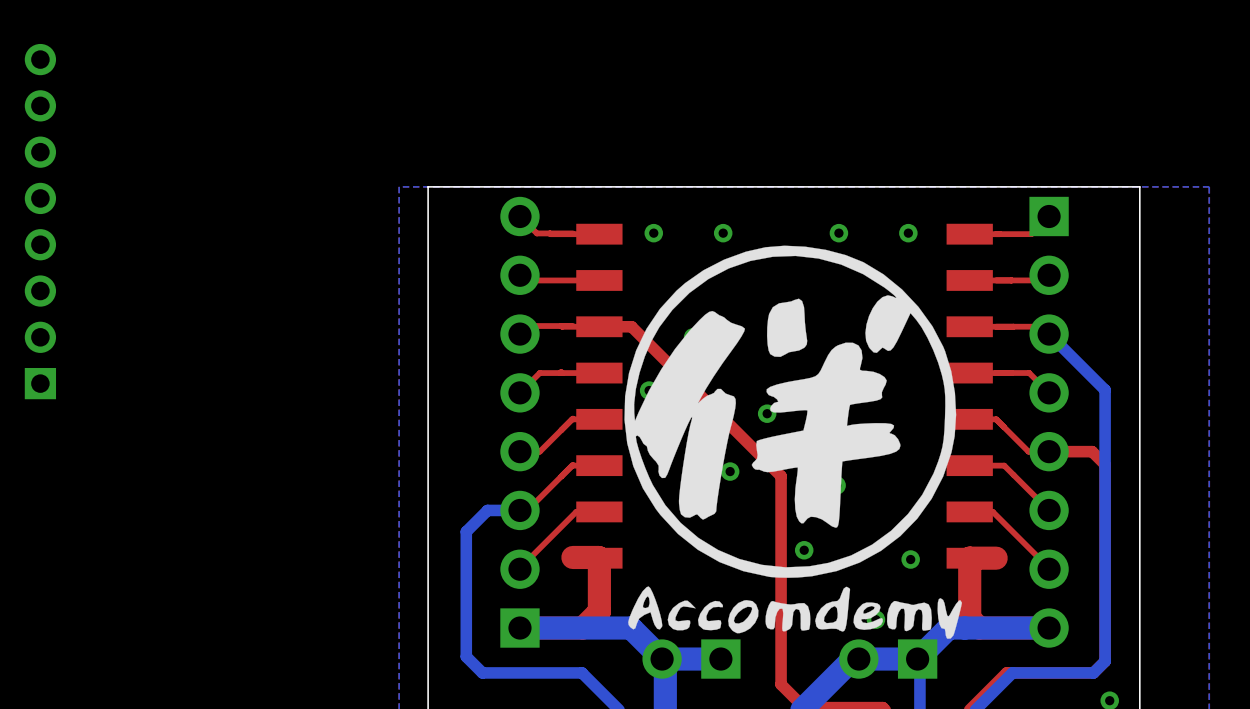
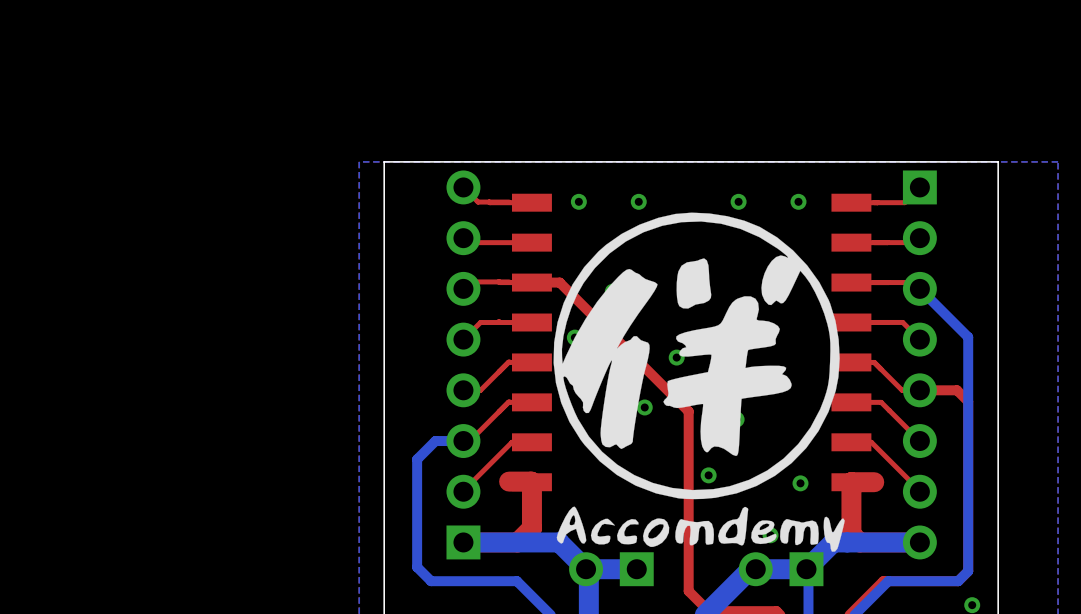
part: (40, 221) -> none

